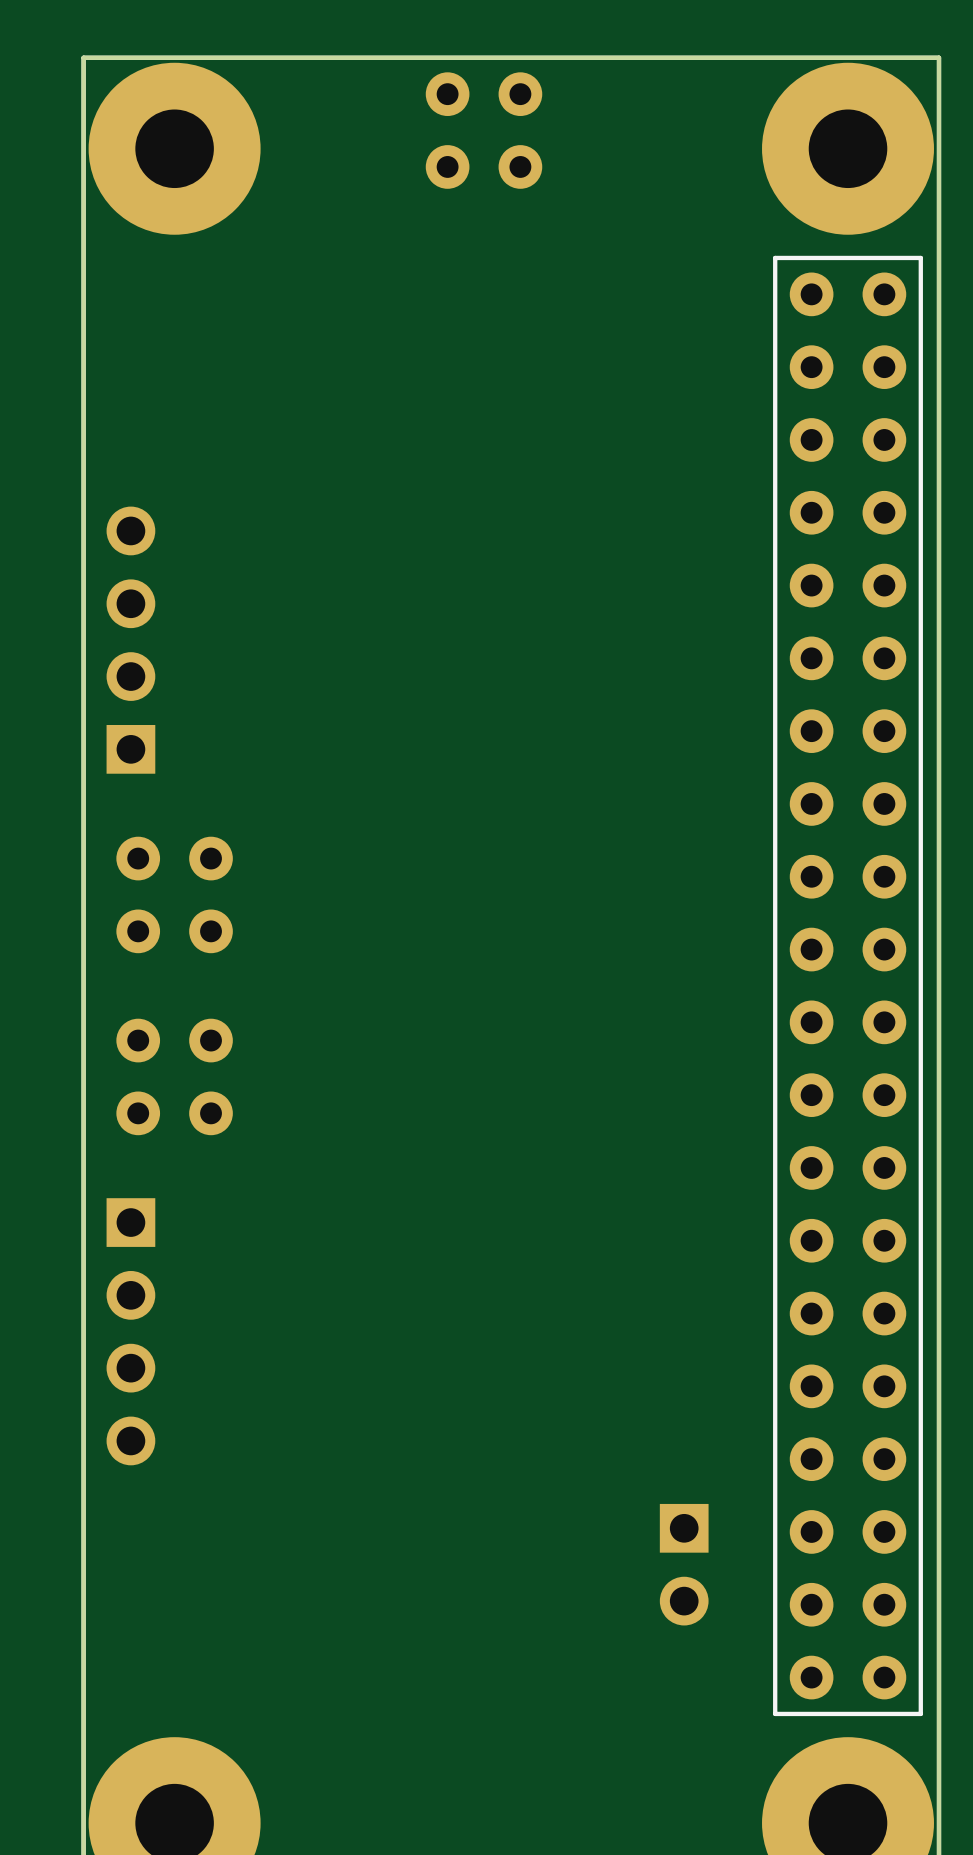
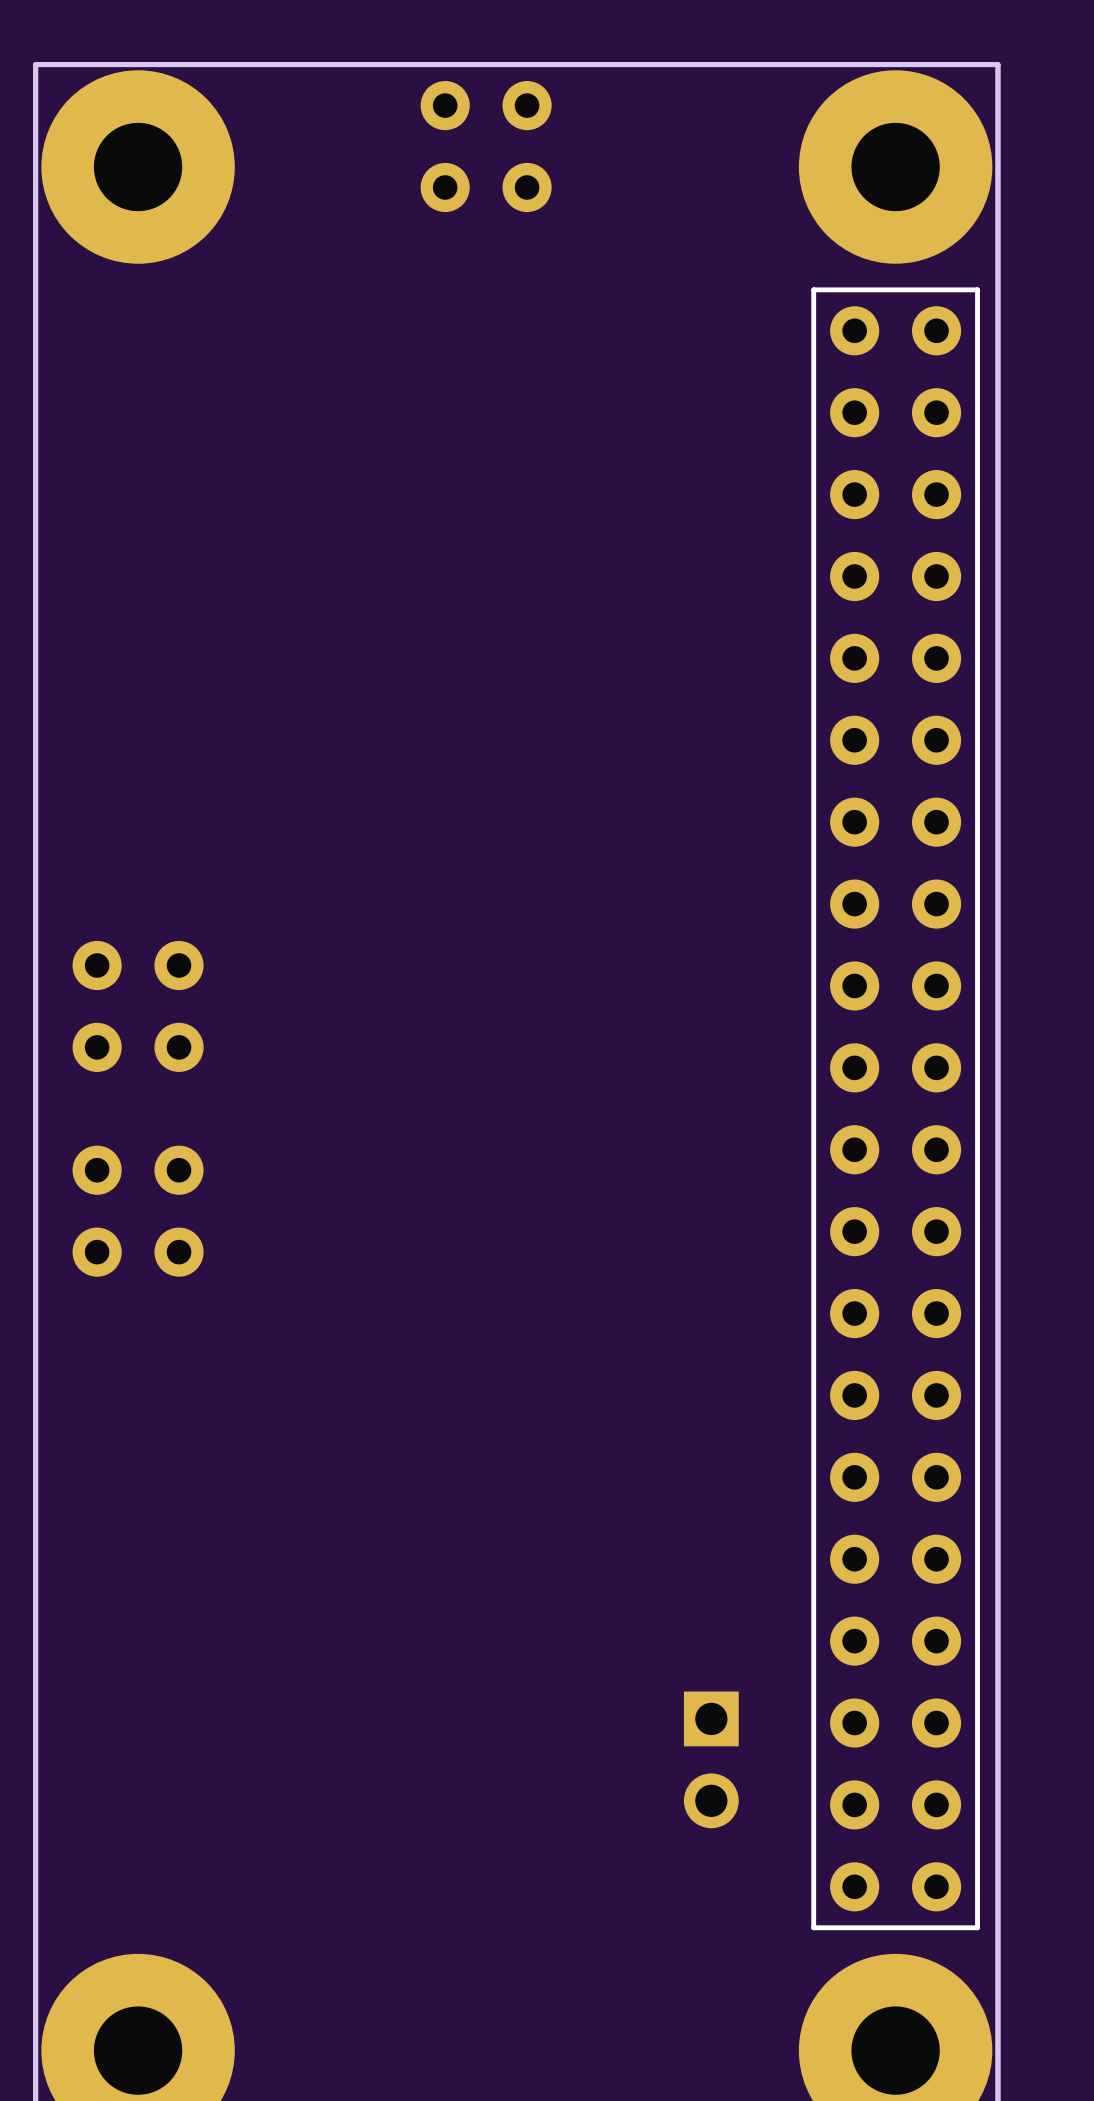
part: (130, 640) -> none
part: (130, 1331) -> none

